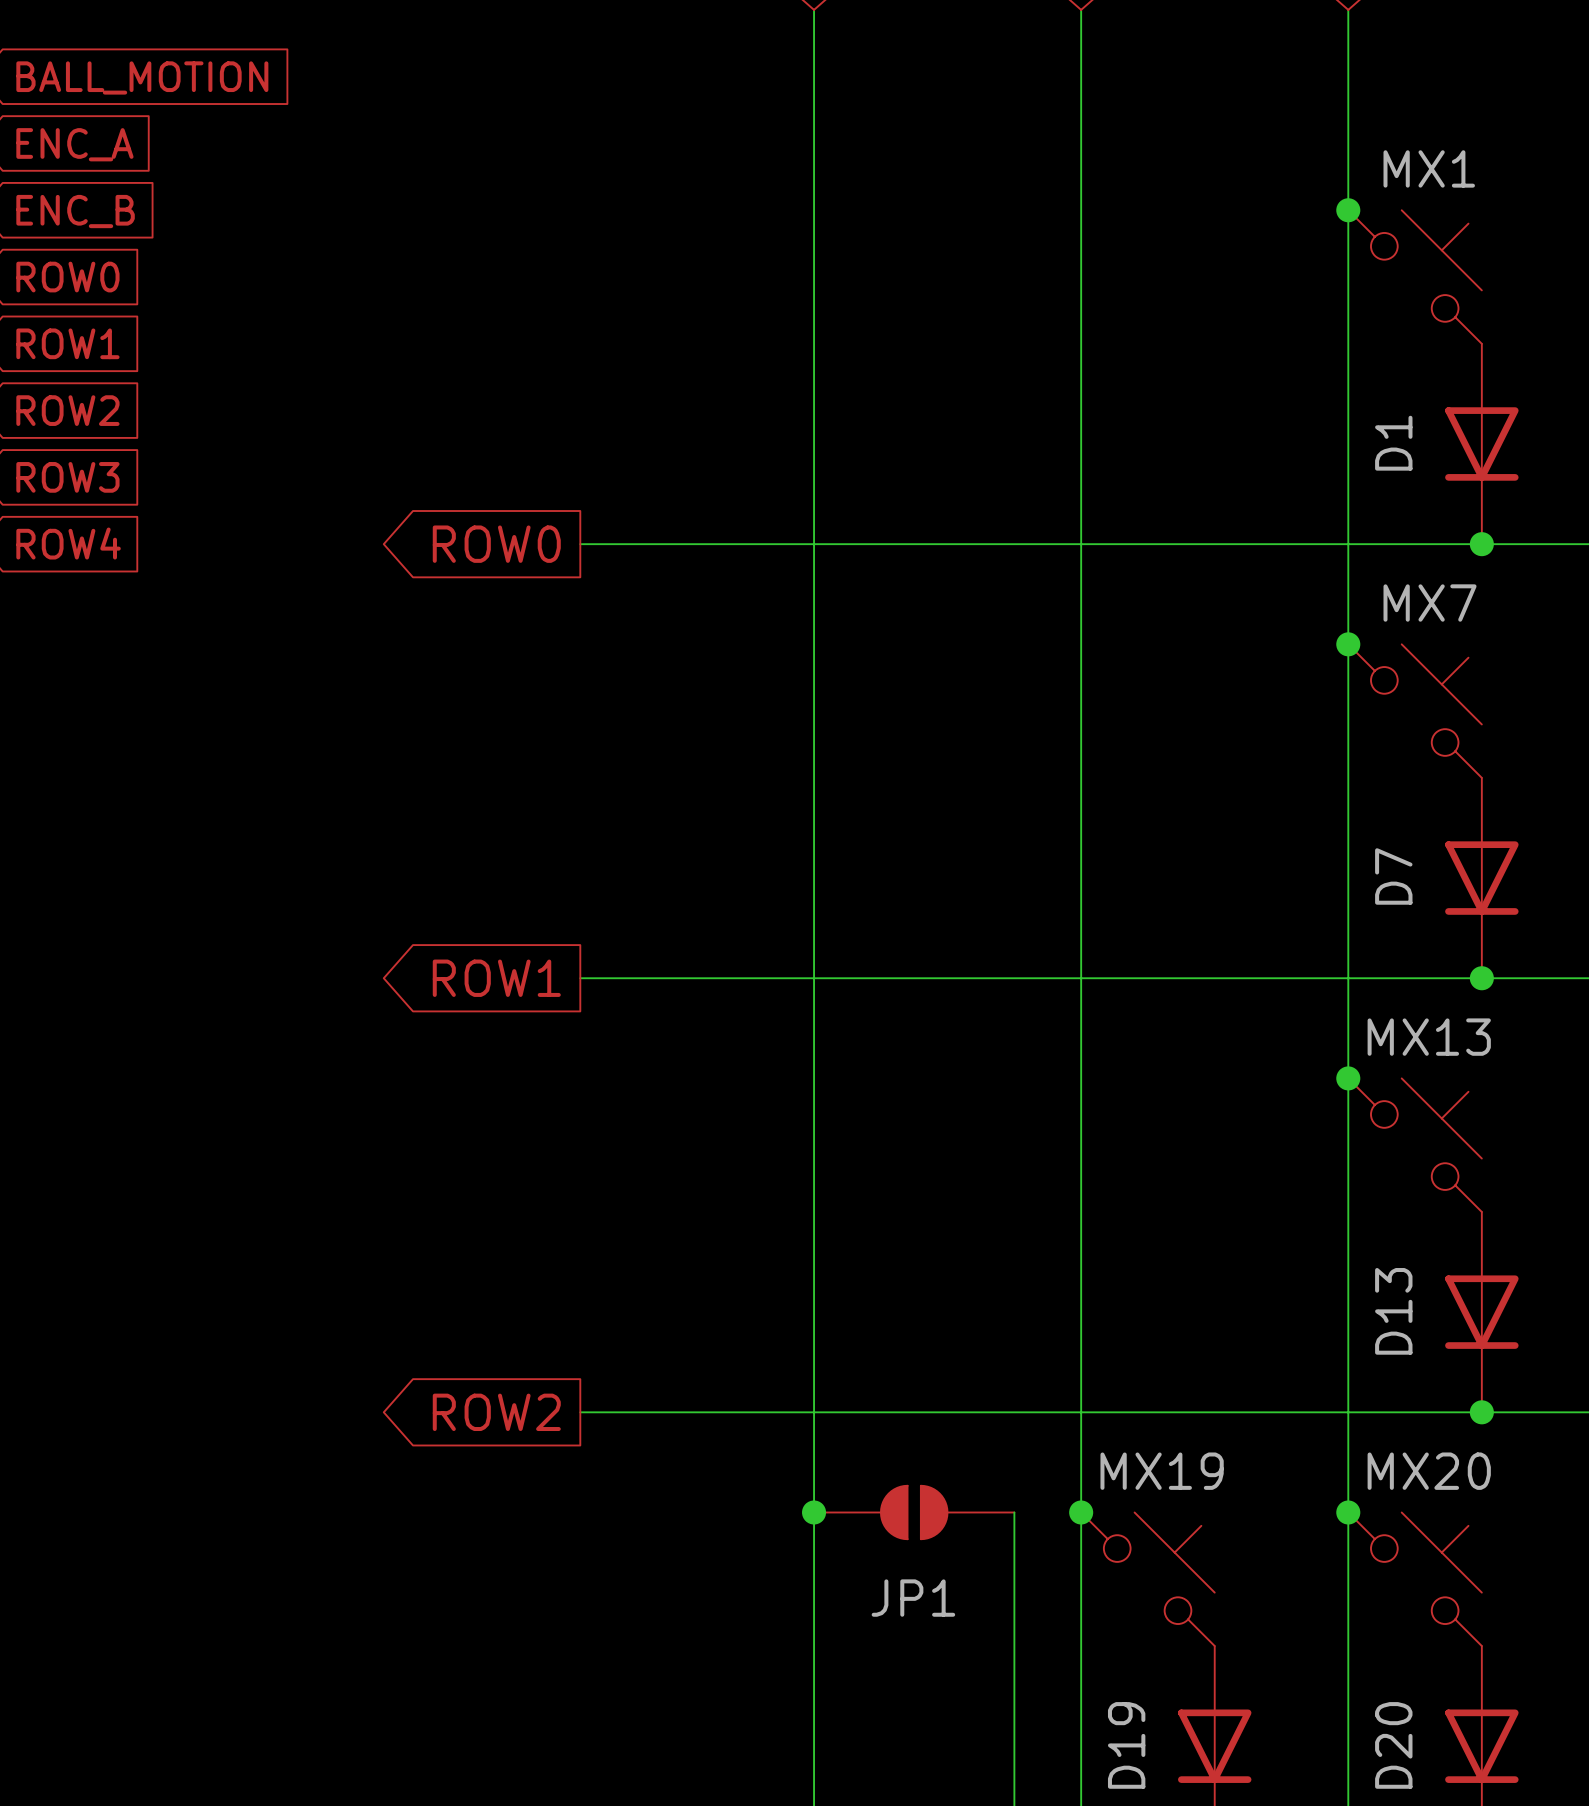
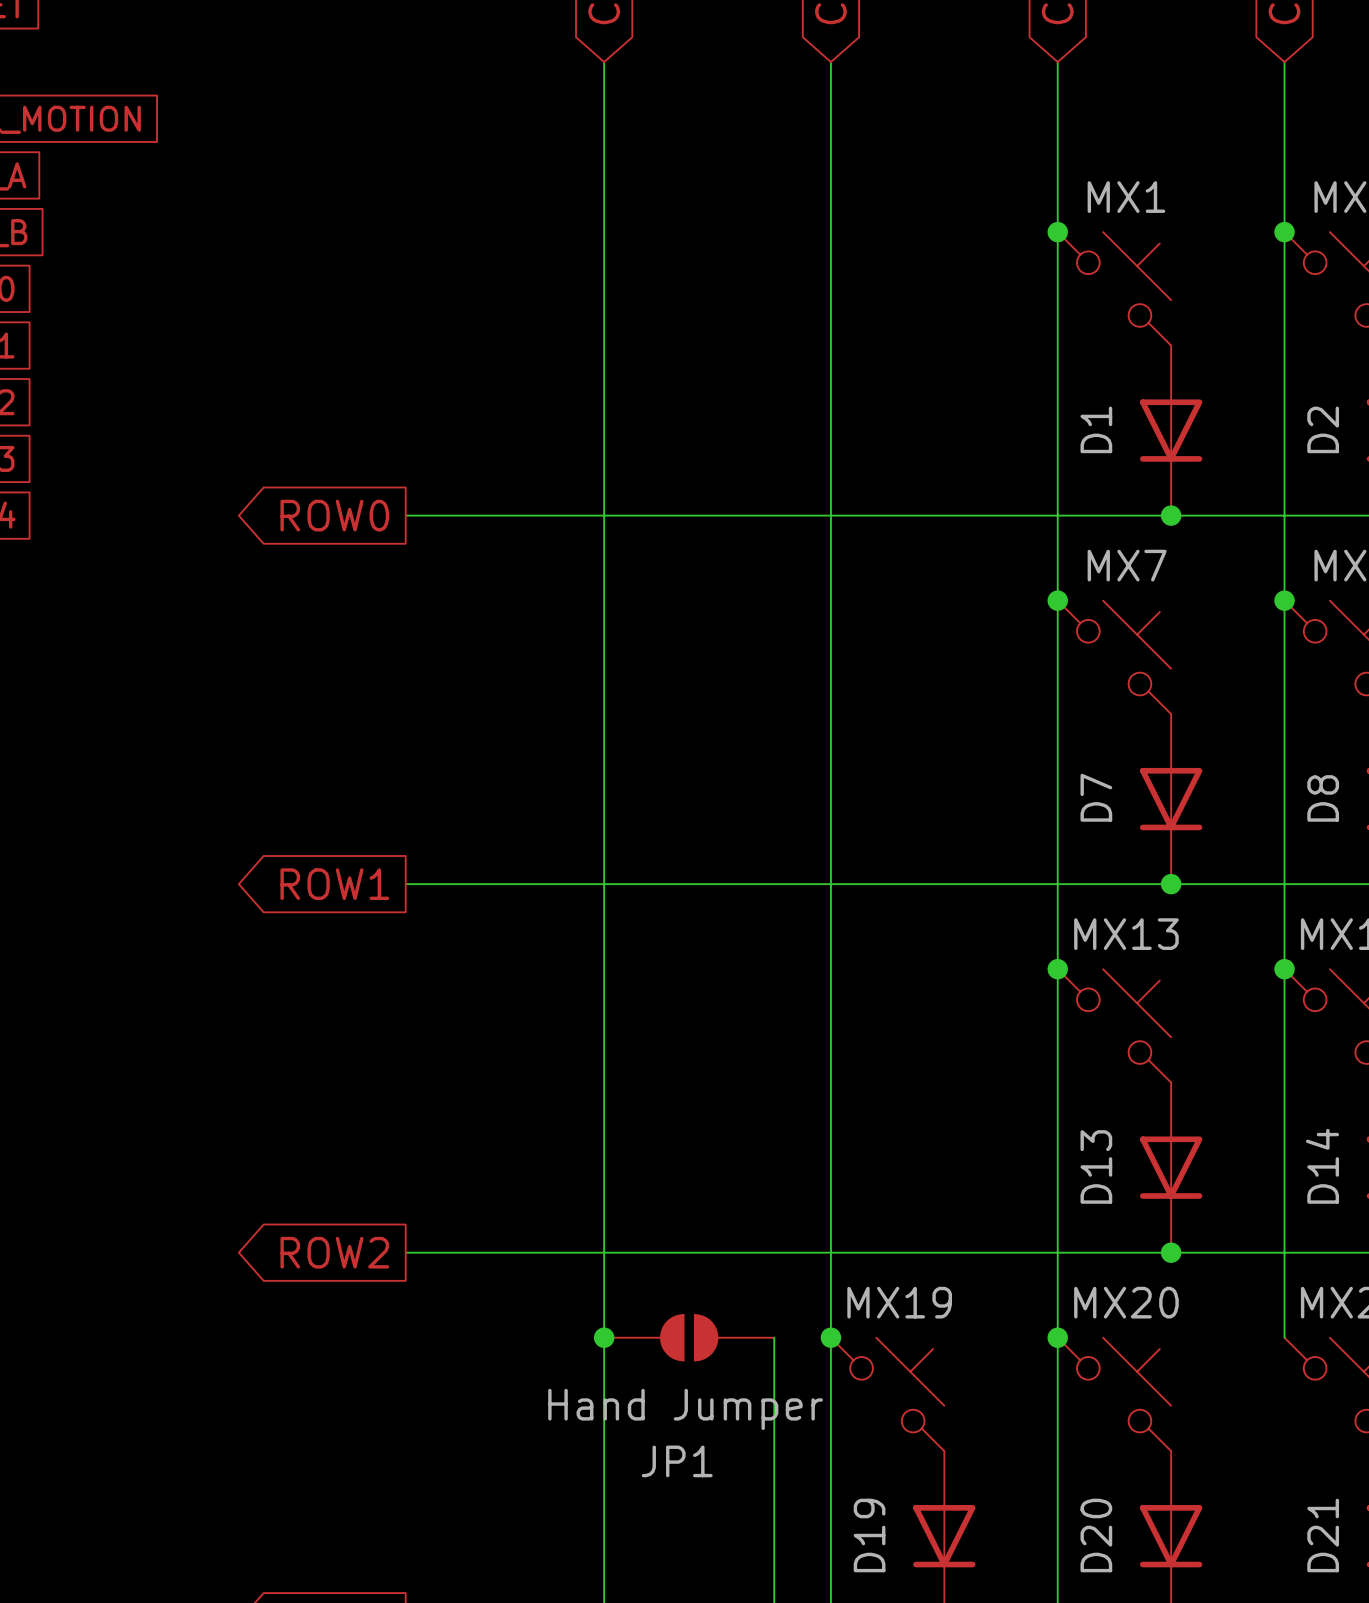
JP1 value: none -> Hand Jumper (685, 1409)
JP1 name position: JP1 (913, 1598) -> JP1 (677, 1461)

